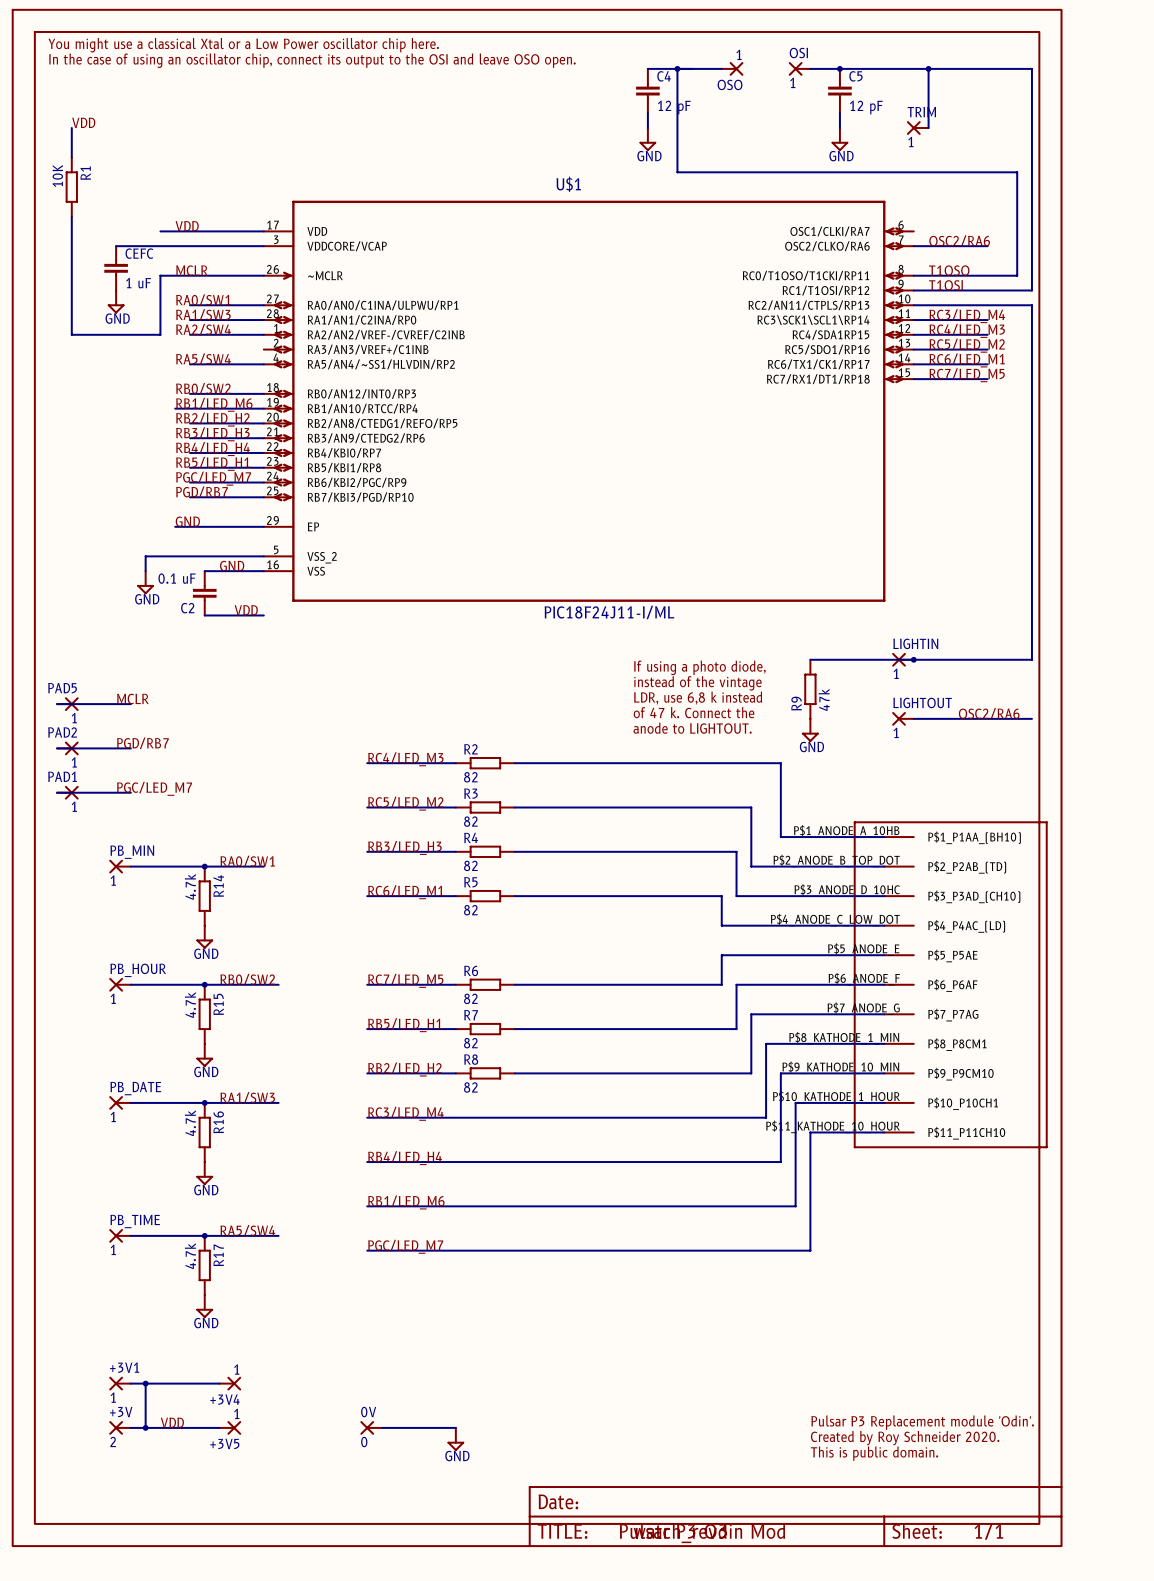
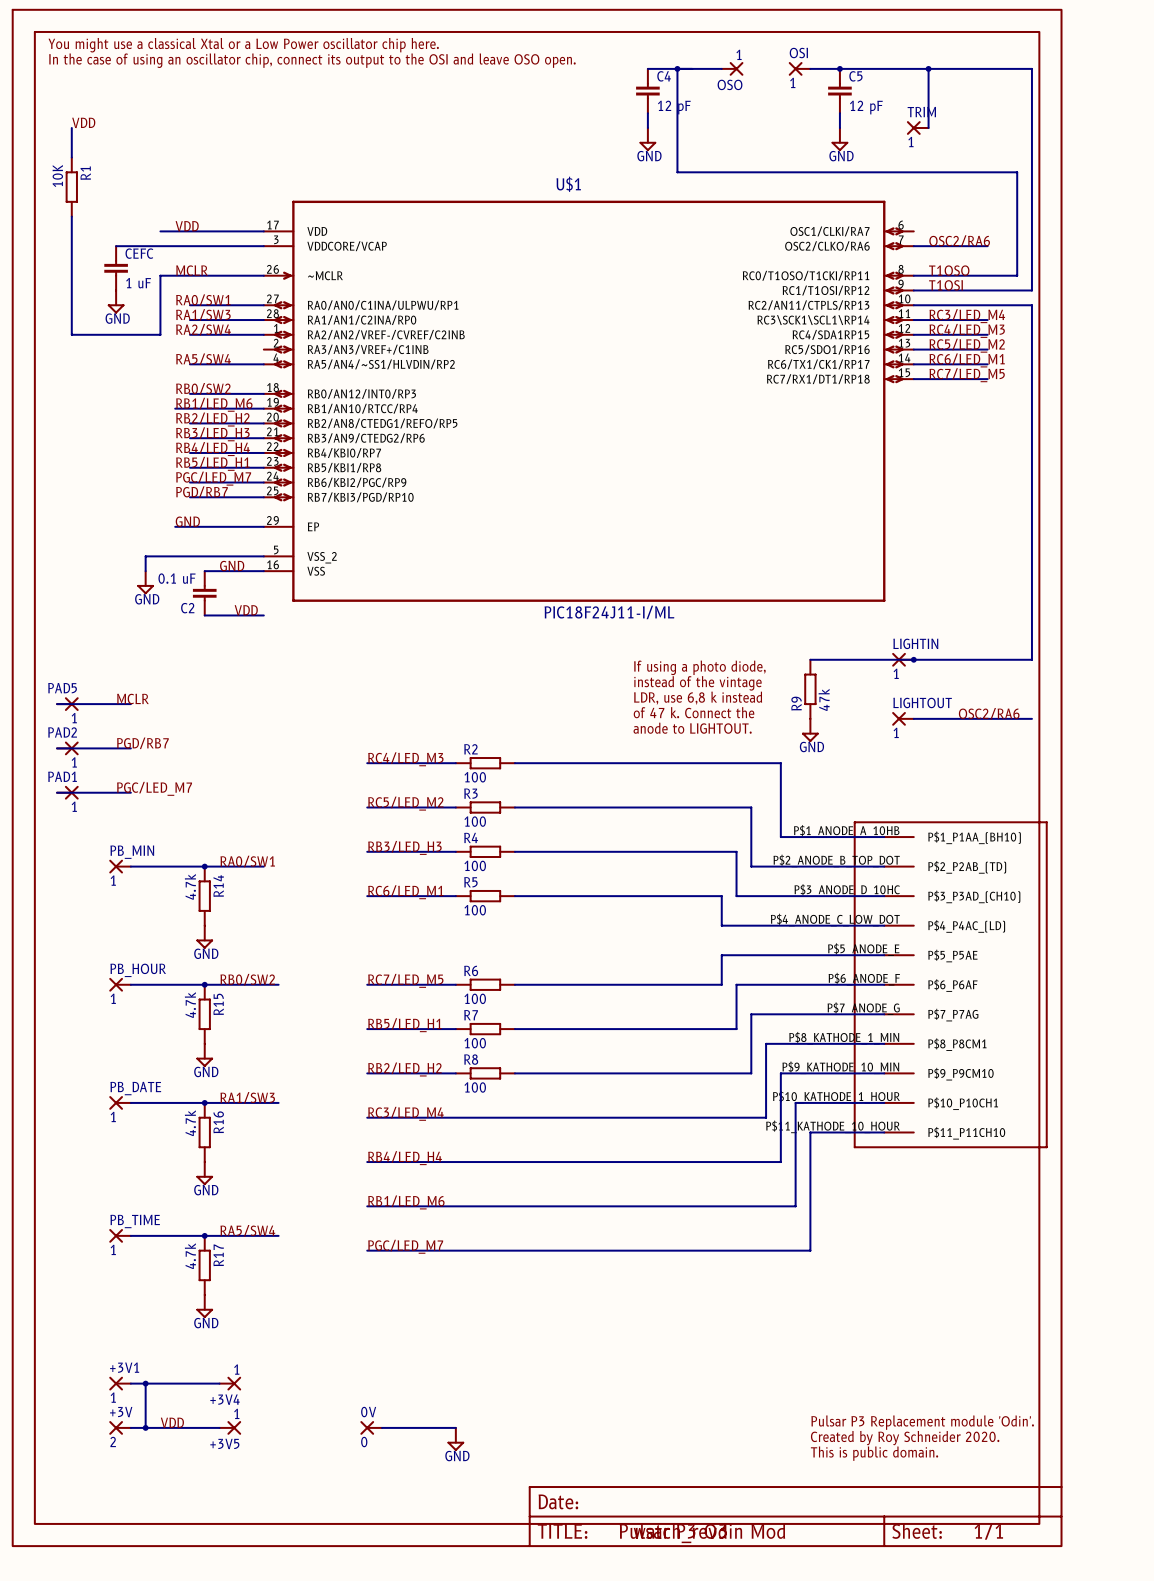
R2 value: 82 (470, 777) -> 100 (475, 777)
R3 value: 82 (470, 821) -> 100 (475, 821)
R4 value: 82 (470, 865) -> 100 (475, 865)
R5 value: 82 (470, 910) -> 100 (475, 910)
R6 value: 82 (470, 998) -> 100 (475, 998)
R7 value: 82 (470, 1043) -> 100 (475, 1043)
R8 value: 82 (470, 1087) -> 100 (475, 1087)

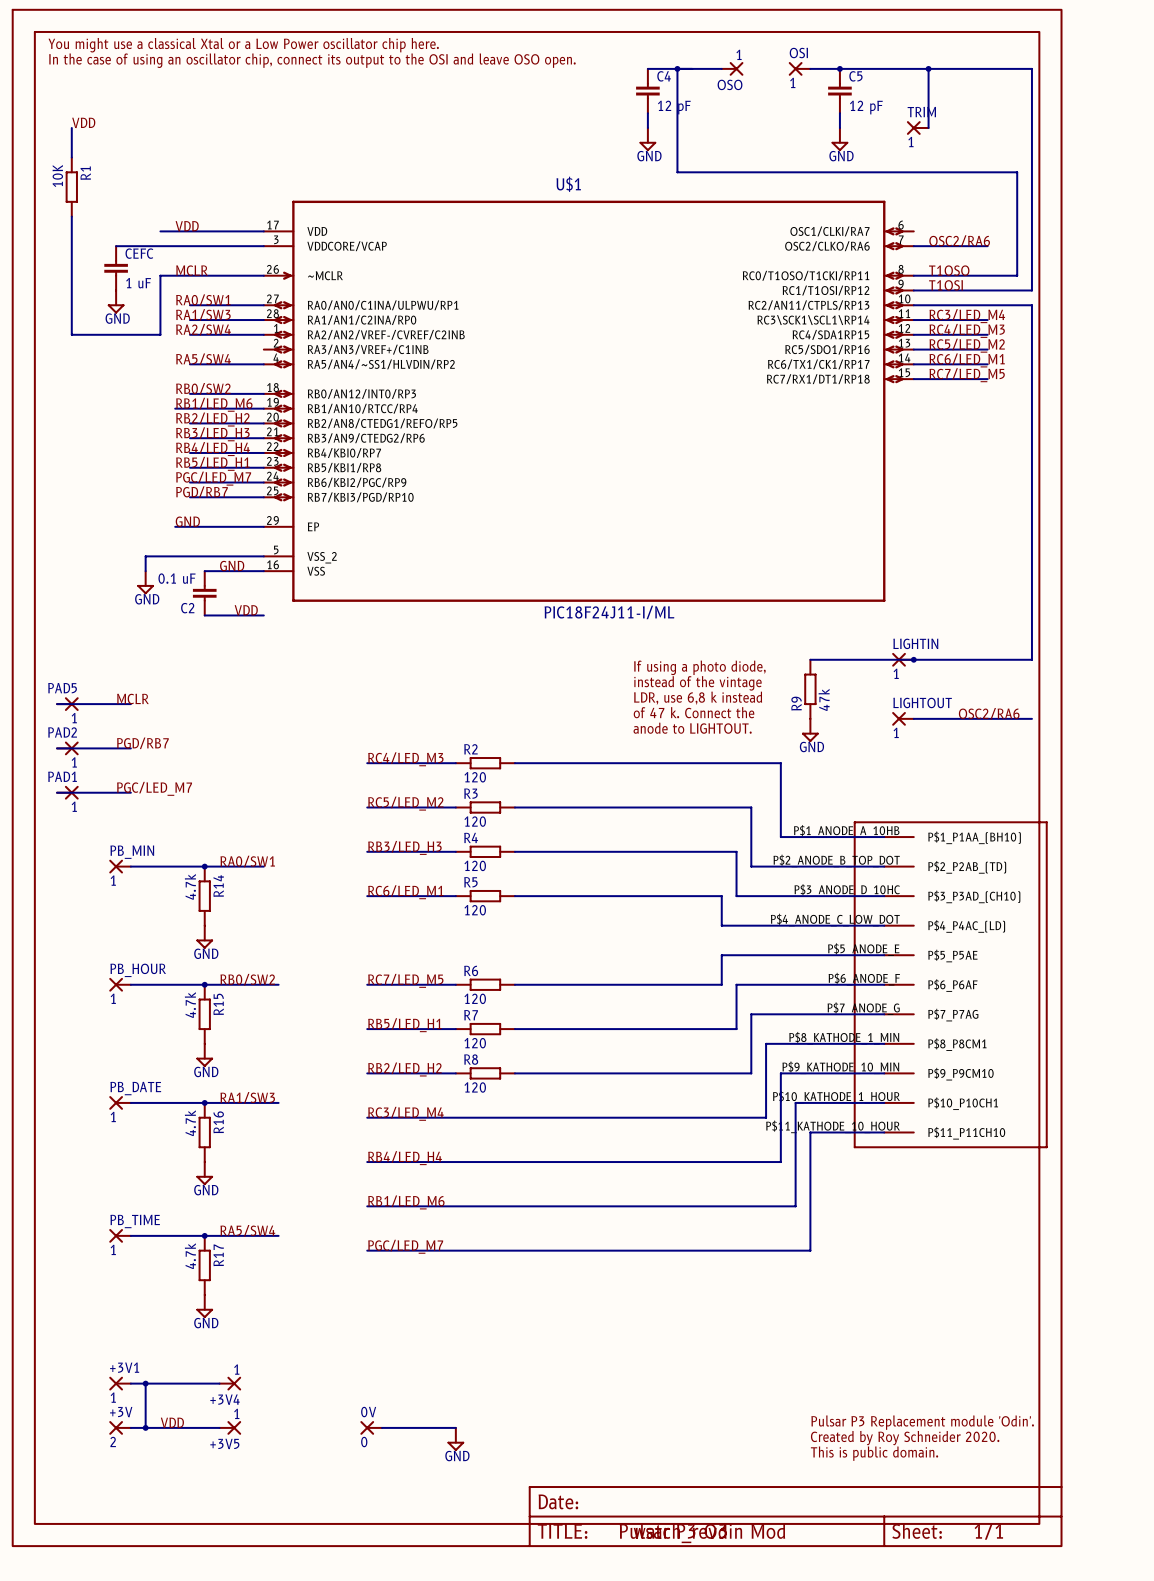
R2 value: 100 (475, 777) -> 120 (475, 777)
R3 value: 100 (475, 821) -> 120 (475, 821)
R4 value: 100 (475, 865) -> 120 (475, 865)
R5 value: 100 (475, 910) -> 120 (475, 910)
R6 value: 100 (475, 998) -> 120 (475, 998)
R7 value: 100 (475, 1043) -> 120 (475, 1043)
R8 value: 100 (475, 1087) -> 120 (475, 1087)

